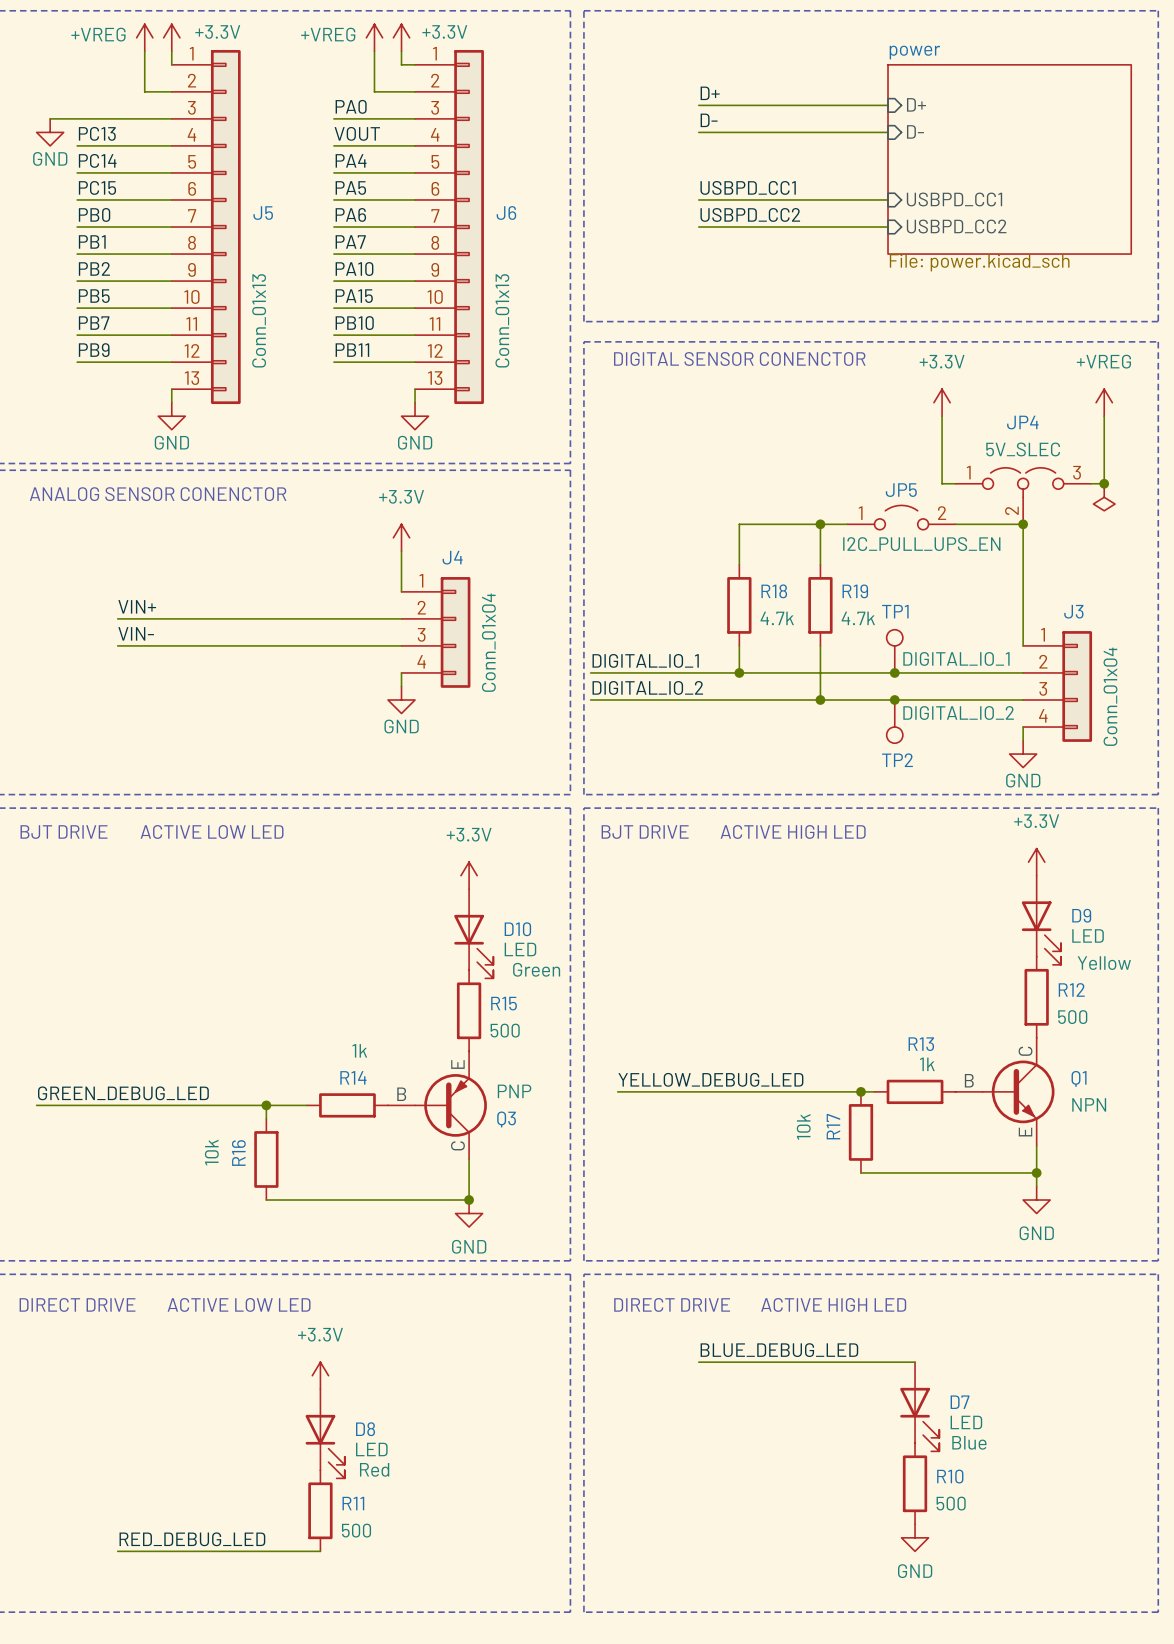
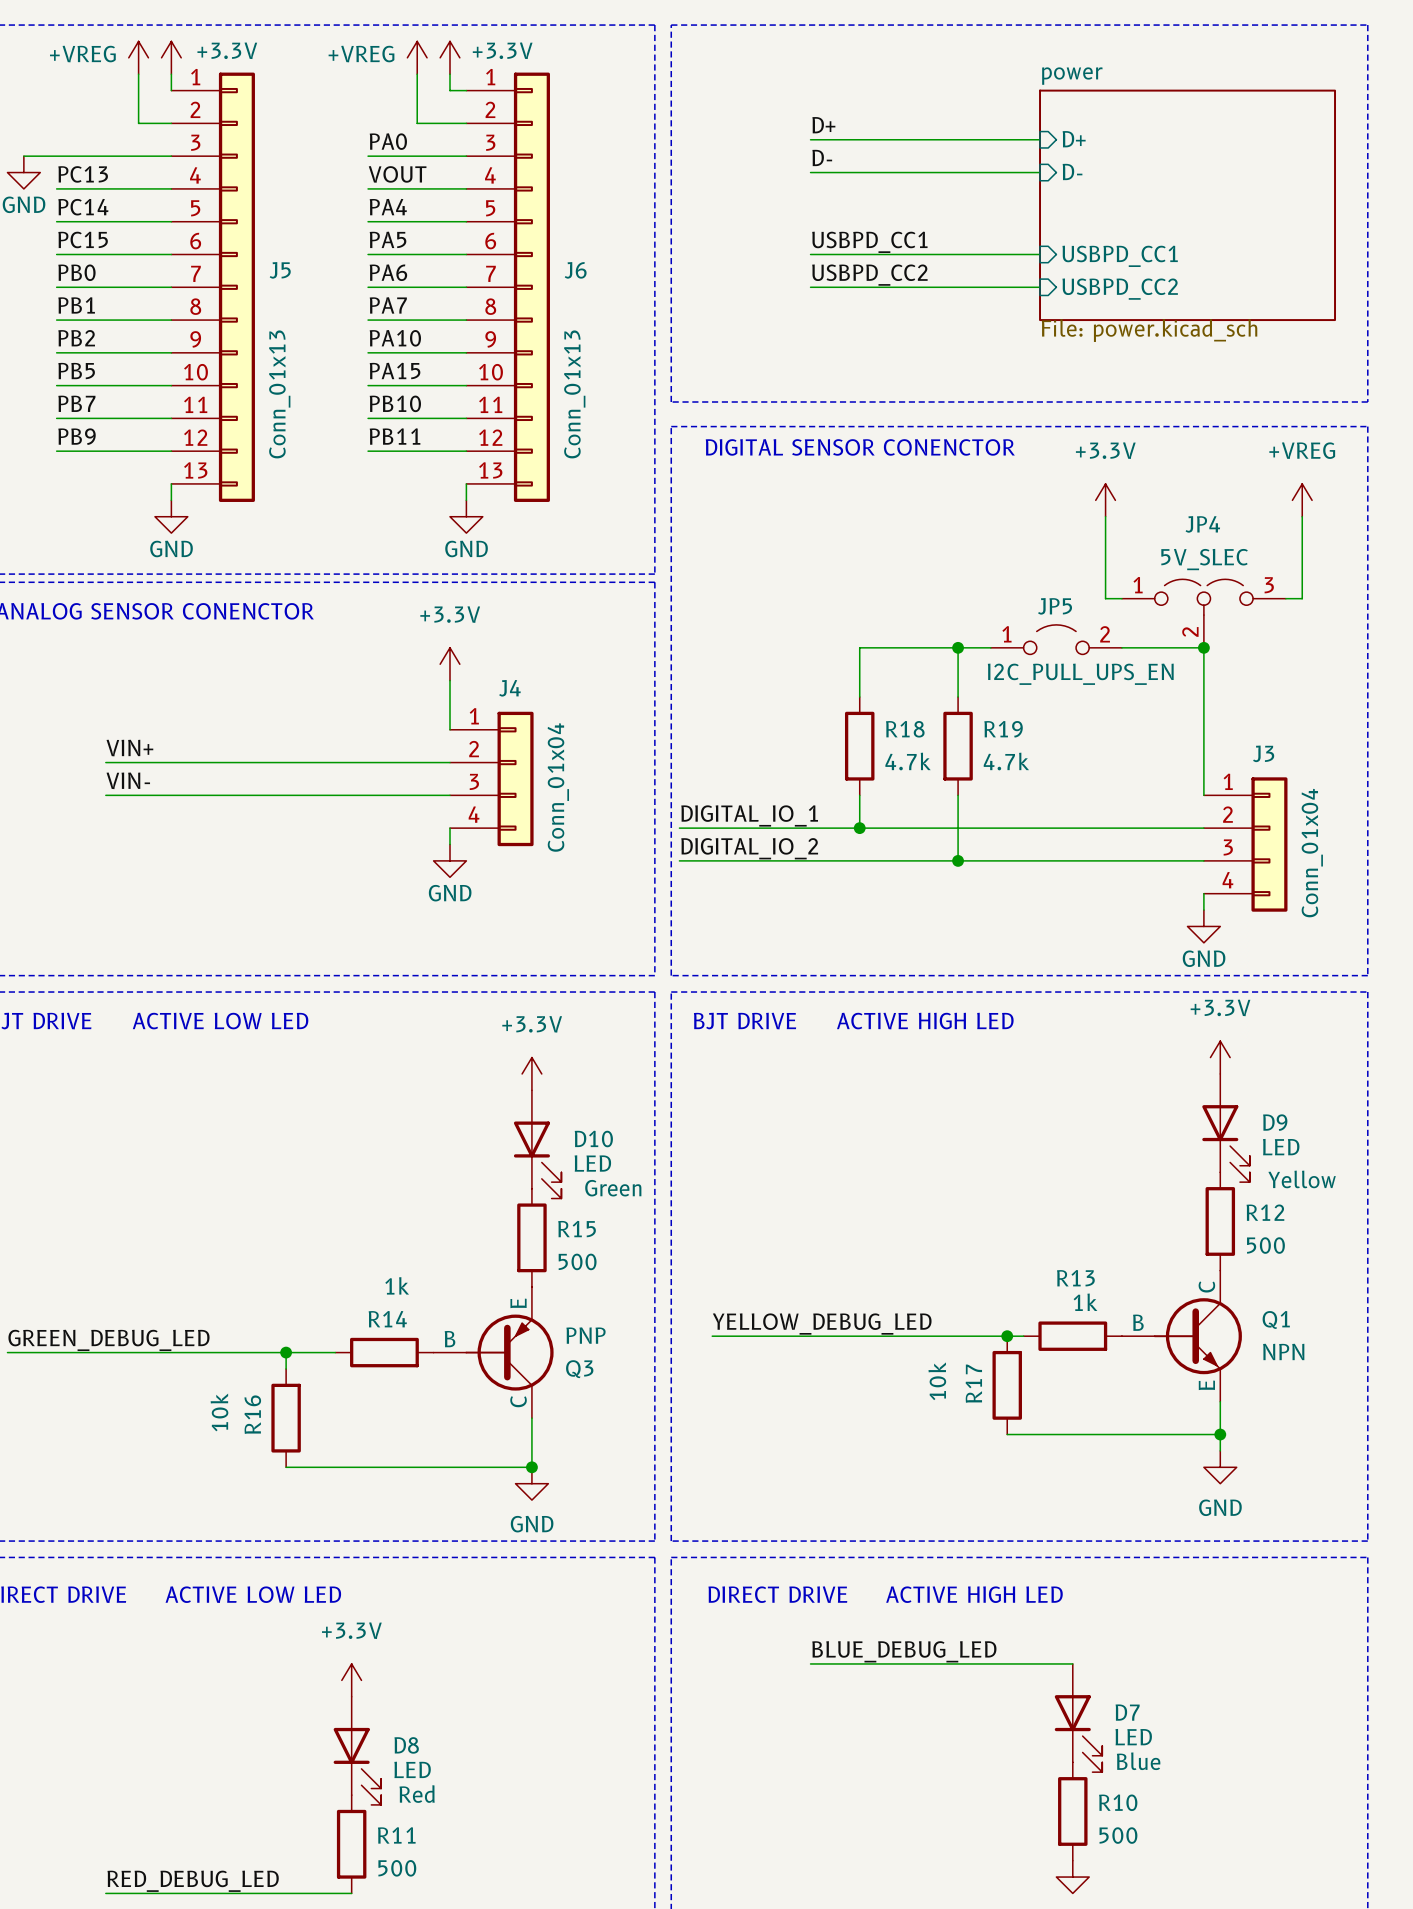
junction: (1104, 483) -> none
power symbol: (1104, 497) -> none
TP1: DIGITAL_IO_1 (894, 651) -> none
junction: (894, 672) -> none
junction: (894, 699) -> none
TP2: DIGITAL_IO_2 (894, 721) -> none

